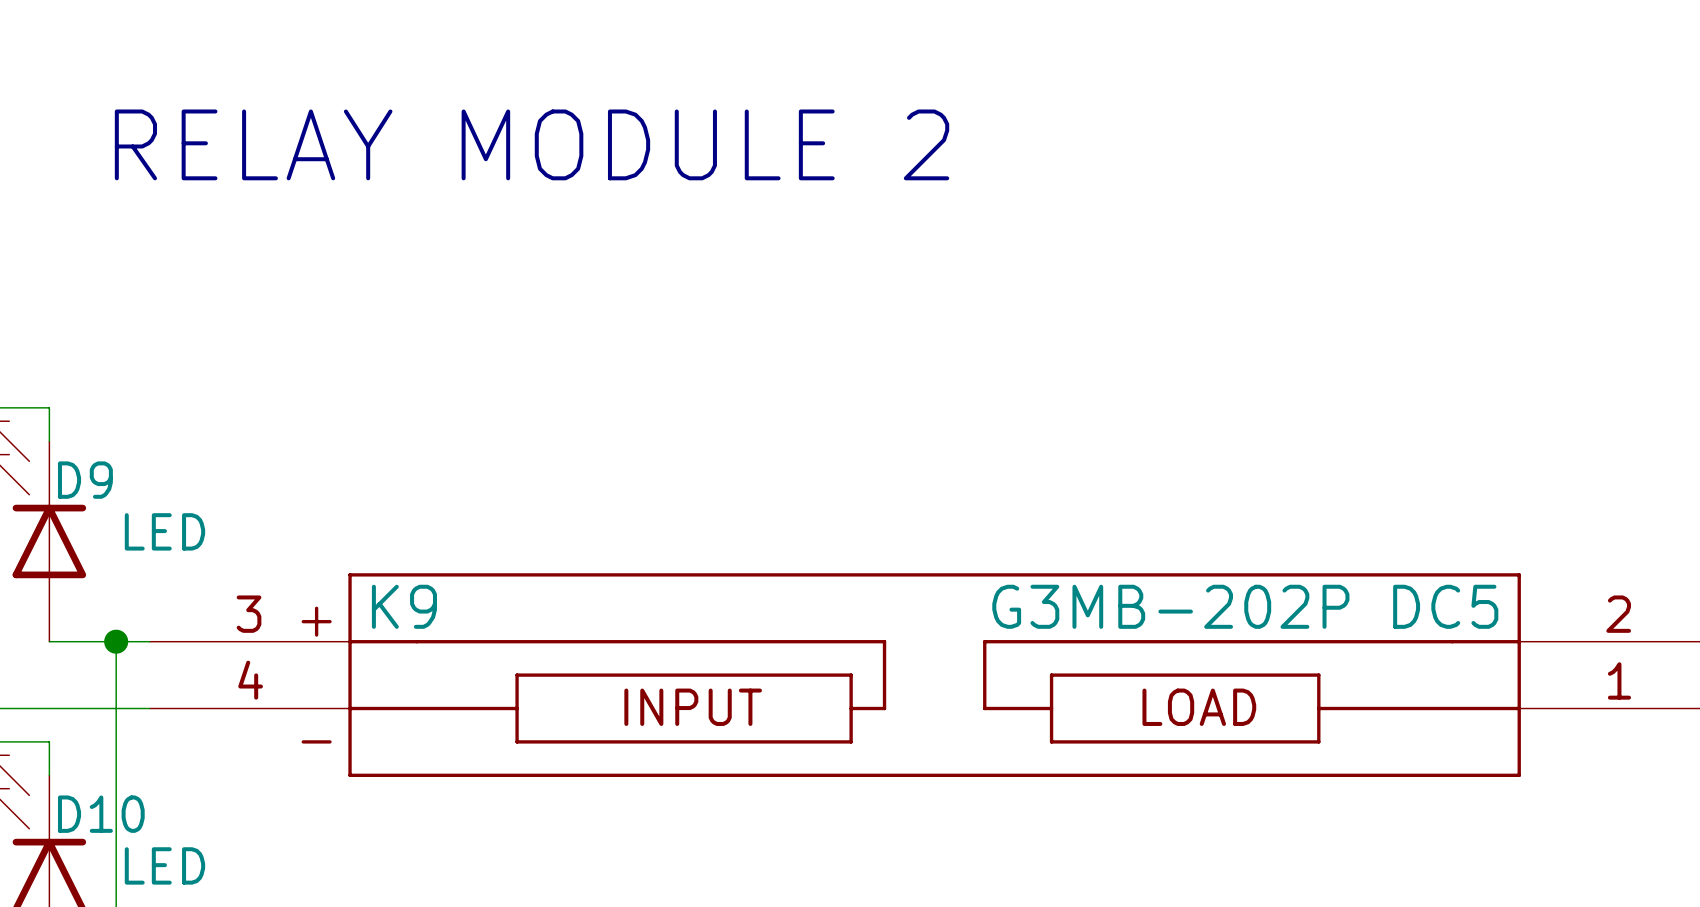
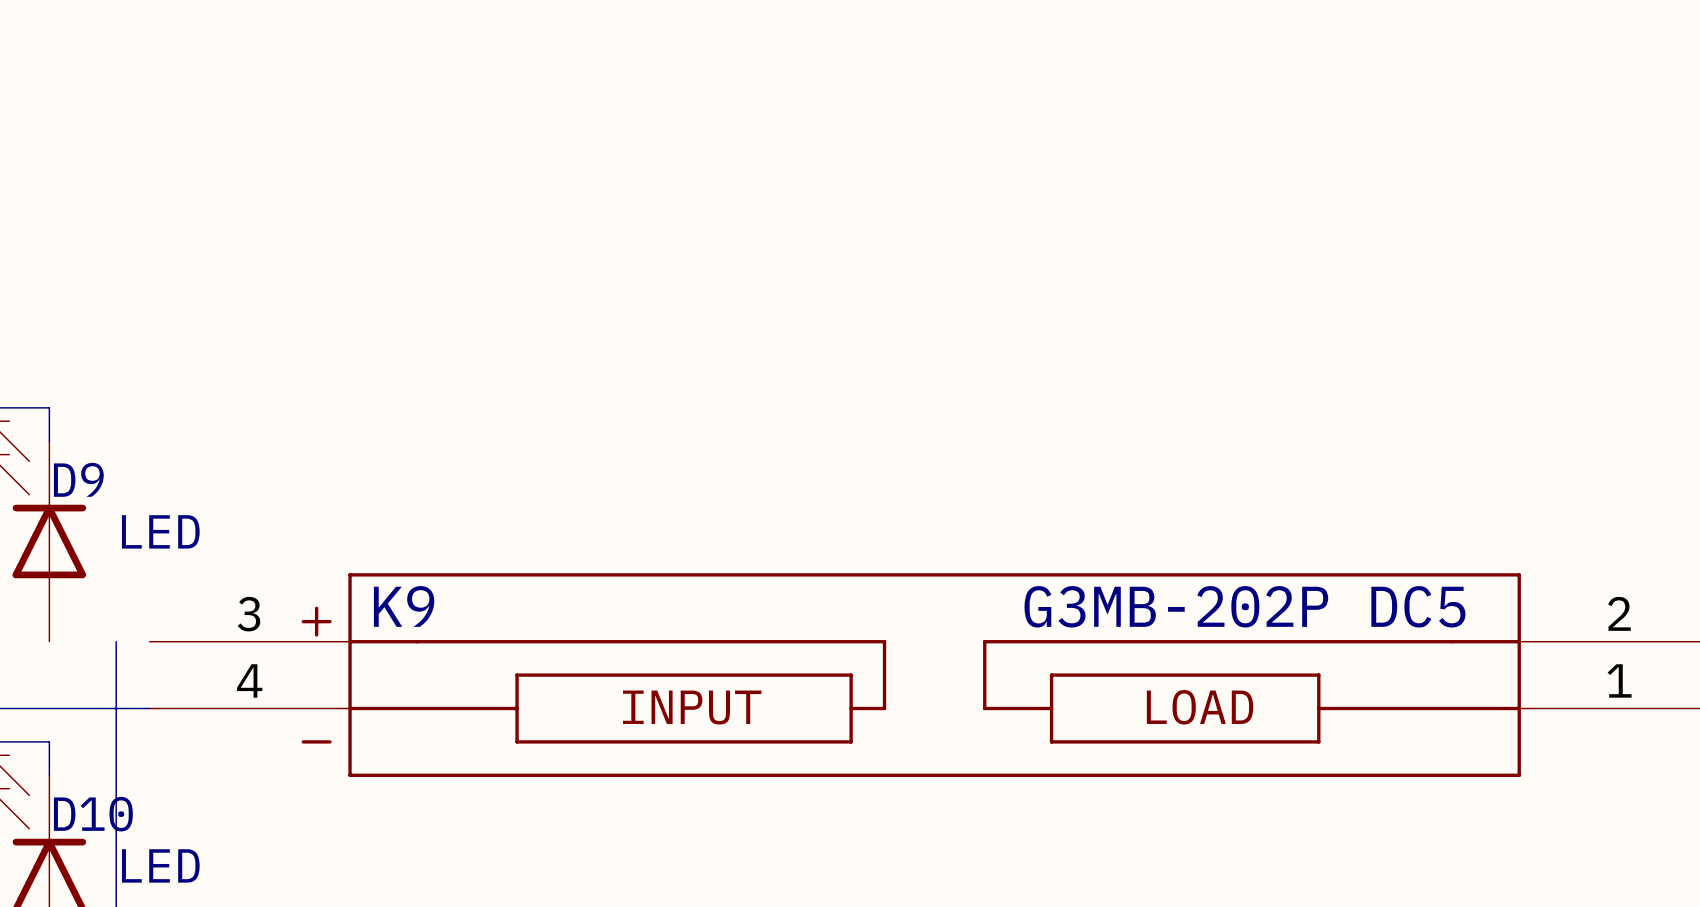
text: RELAY MODULE 2 (532, 144) -> none
wire: (49, 641) (149, 641) -> none
junction: (116, 641) -> none

